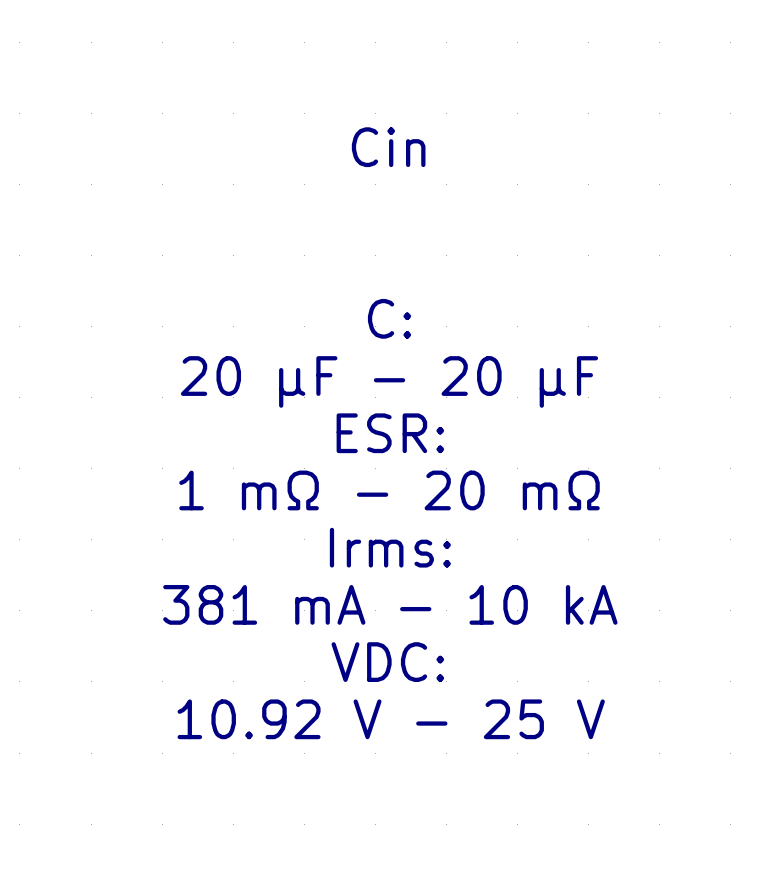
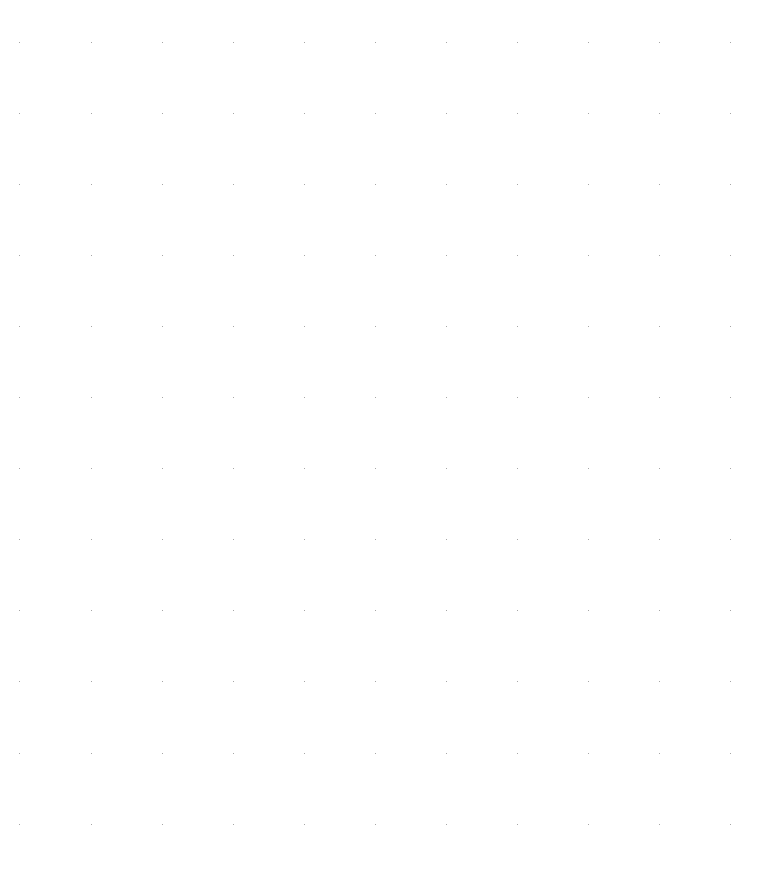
text: Cin (388, 147) -> none
text: C: (389, 318) -> none
text: 20 μF - 20 μF (389, 381) -> none
text: ESR: (390, 433) -> none
text: 1 mΩ - 20 mΩ (389, 490) -> none
text: Irms: (390, 547) -> none
text: 381 mA - 10 kA (390, 604) -> none
text: VDC: (387, 662) -> none
text: 10.92 V - 25 V (391, 719) -> none

